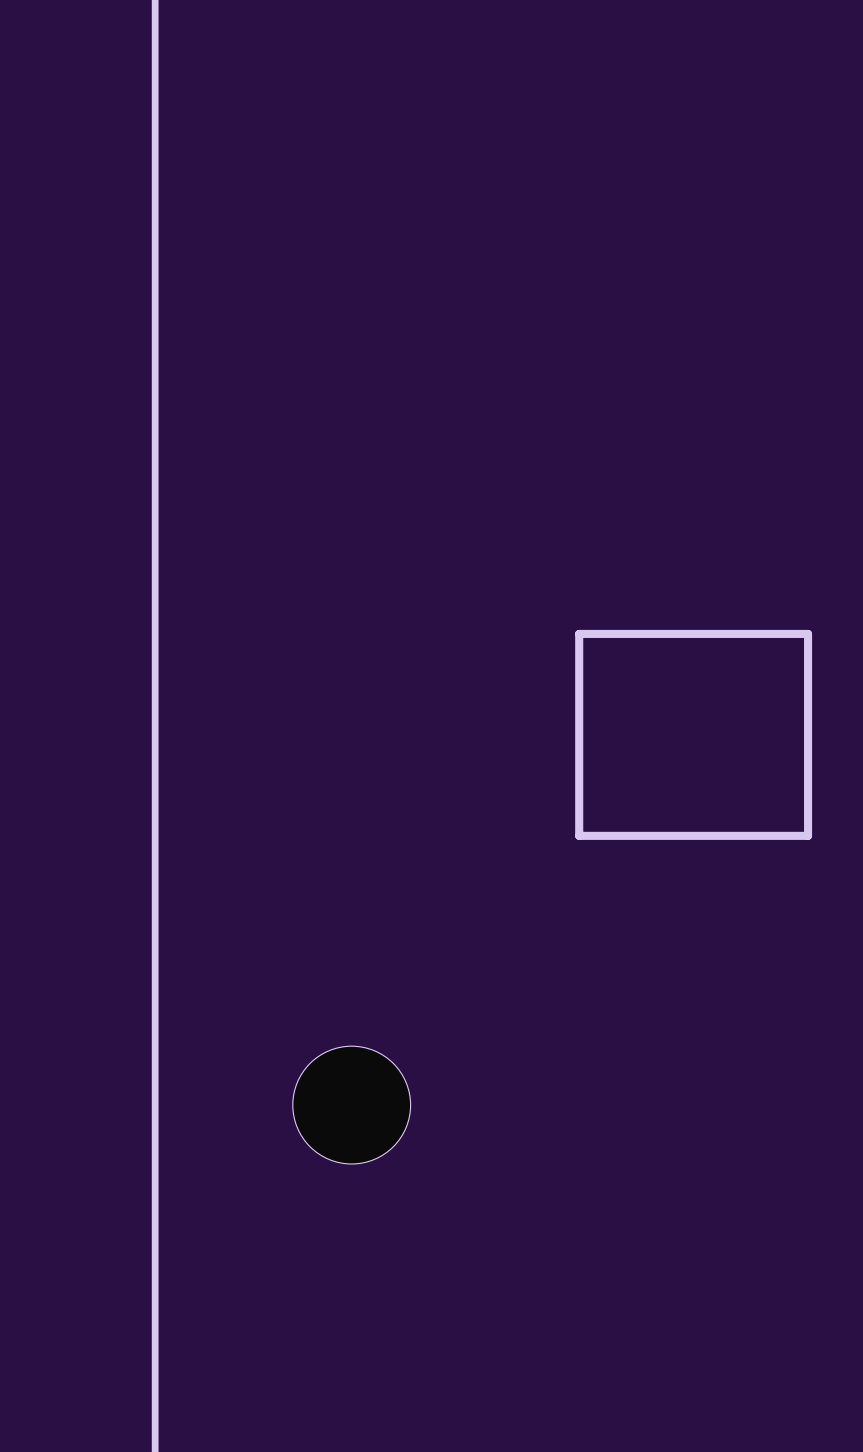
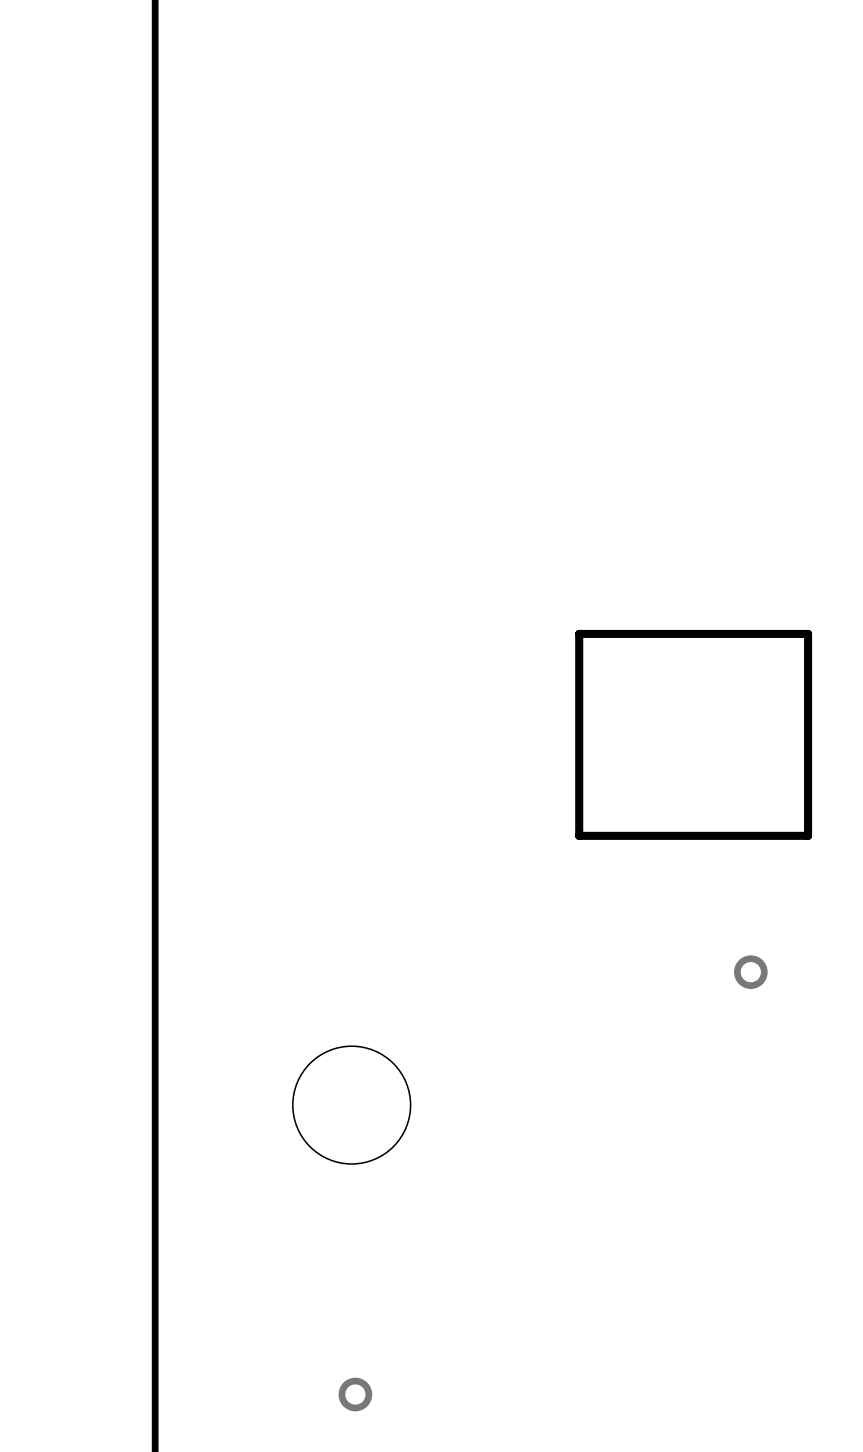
via: none -> (750, 972)
via: none -> (355, 1394)

